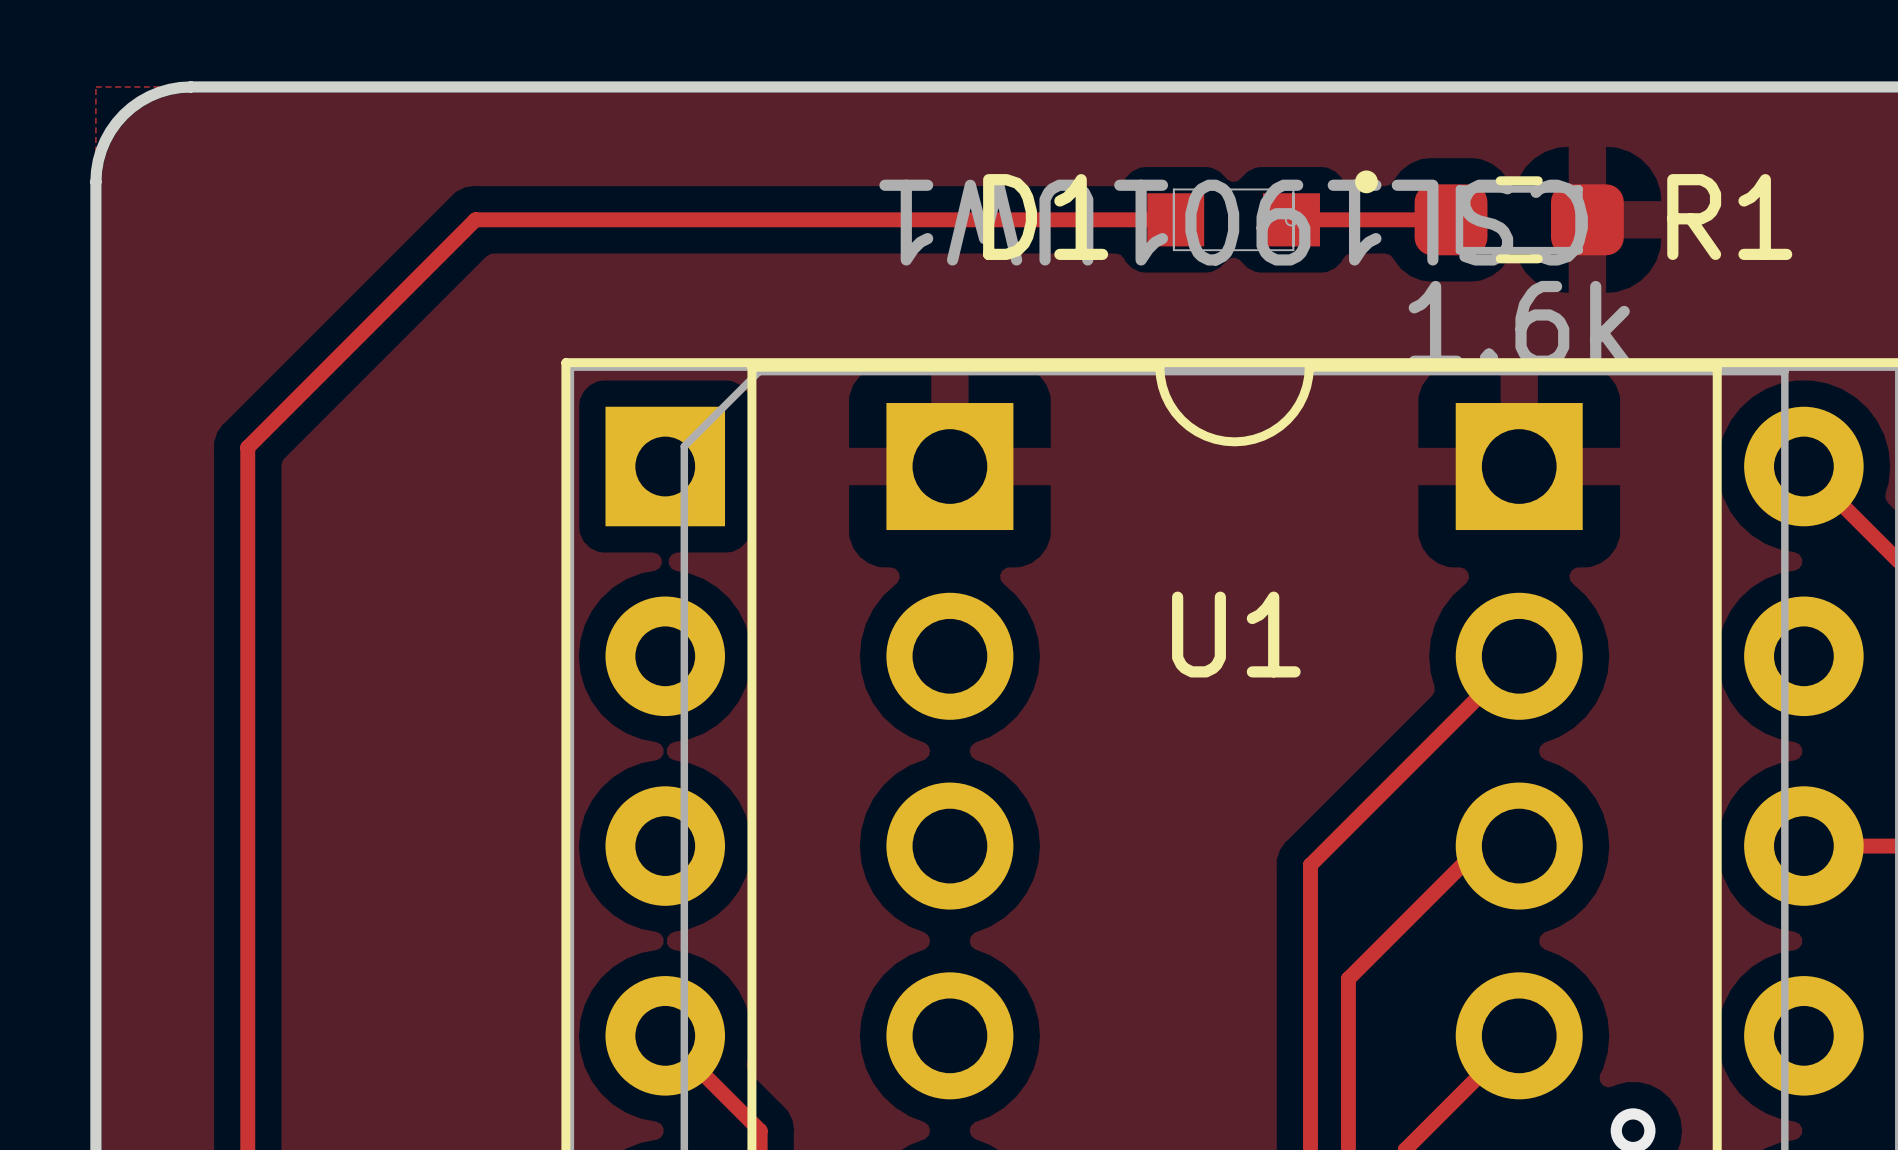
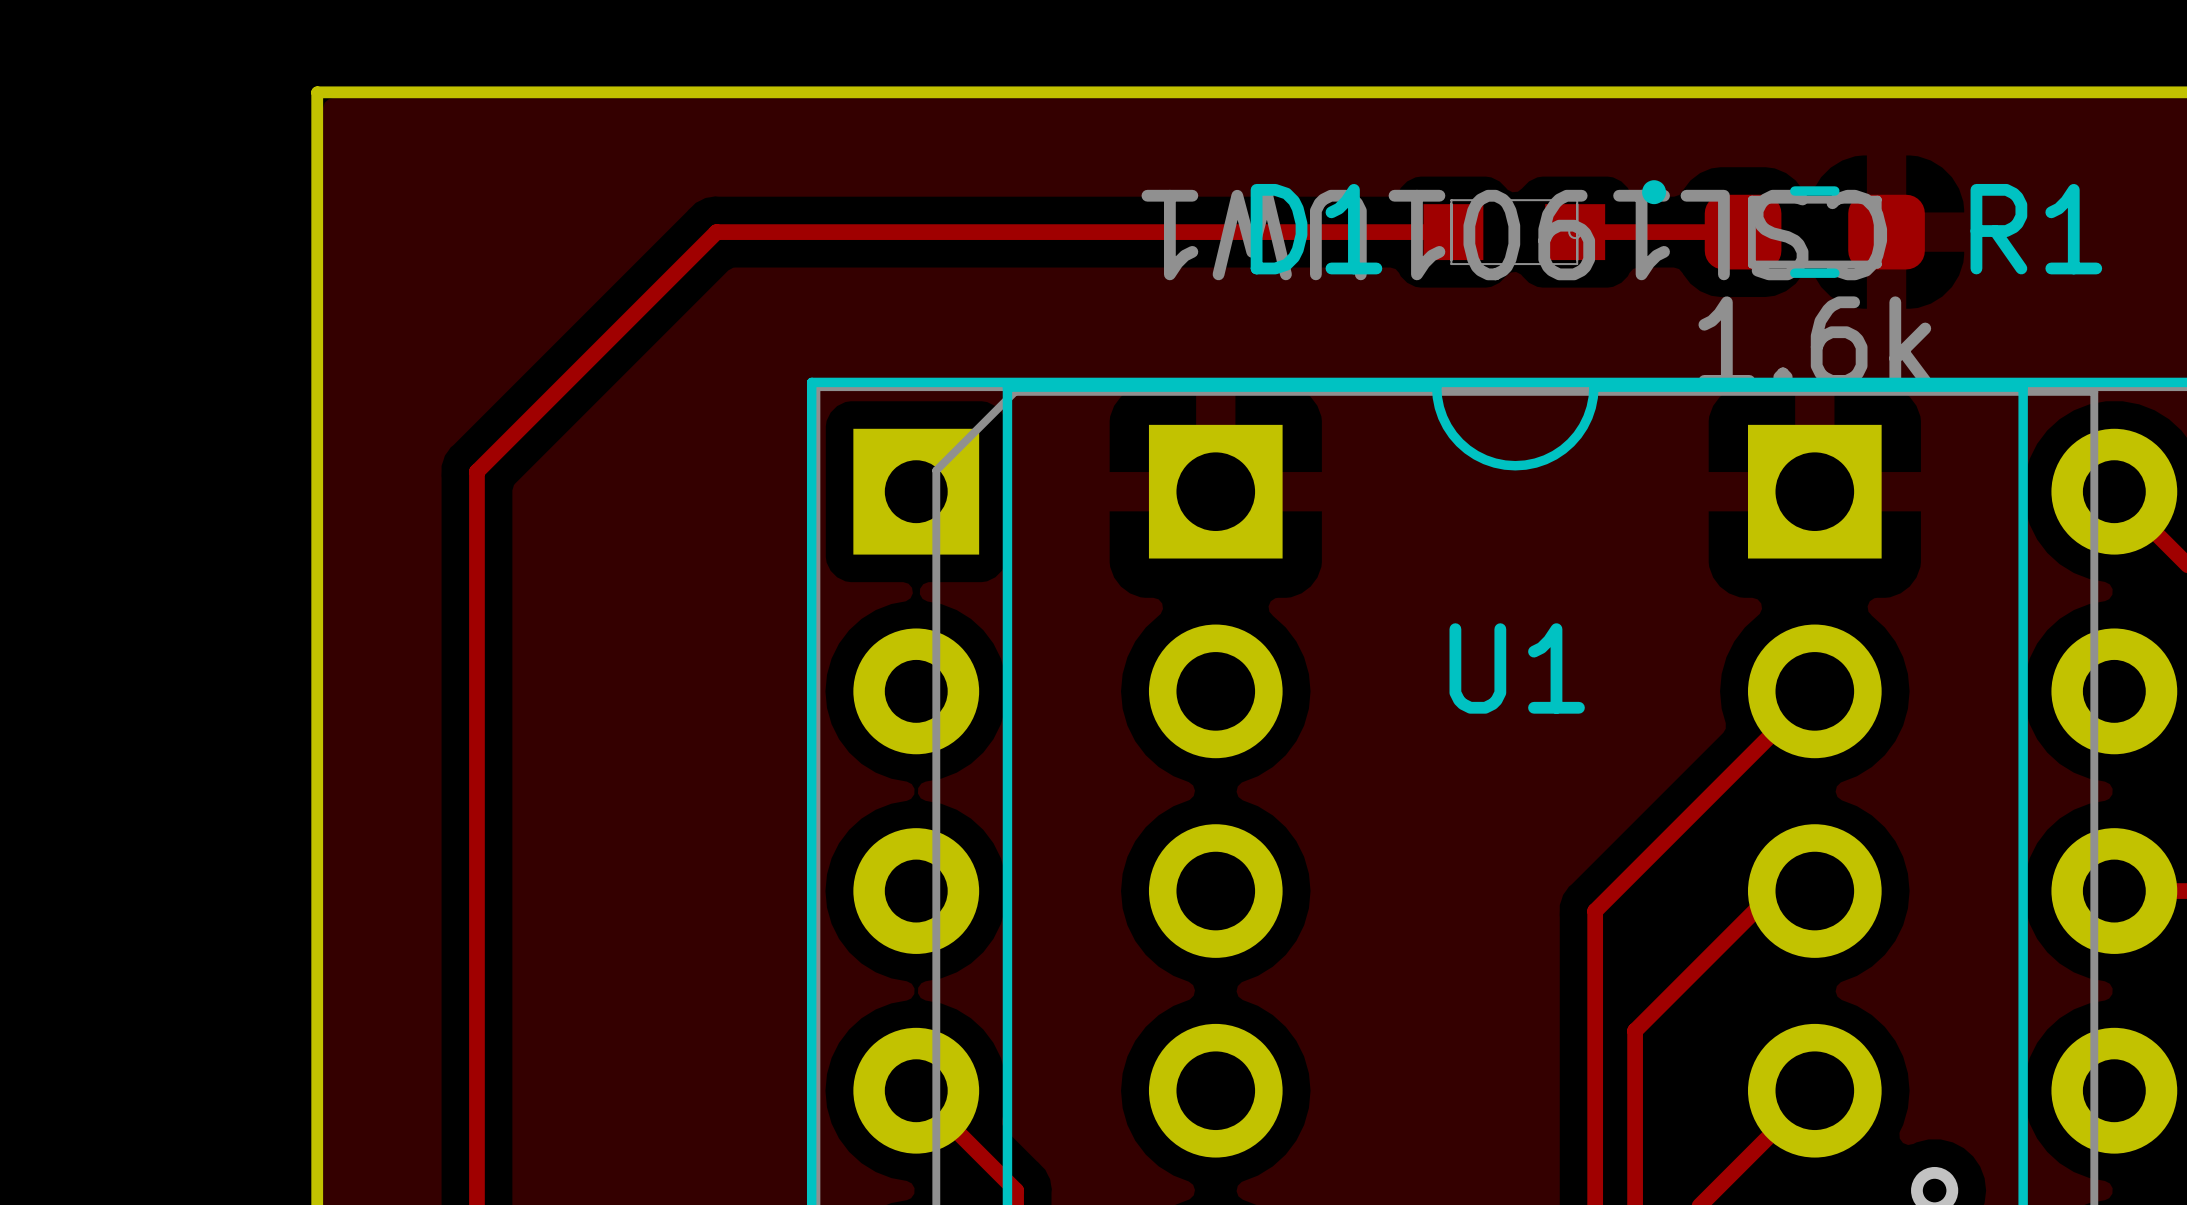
board edge: (190, 86) (159, 92) (140, 101) (123, 114) (105, 140) (98, 160) (95, 181) -> (417, 92) (317, 92) (317, 192)

